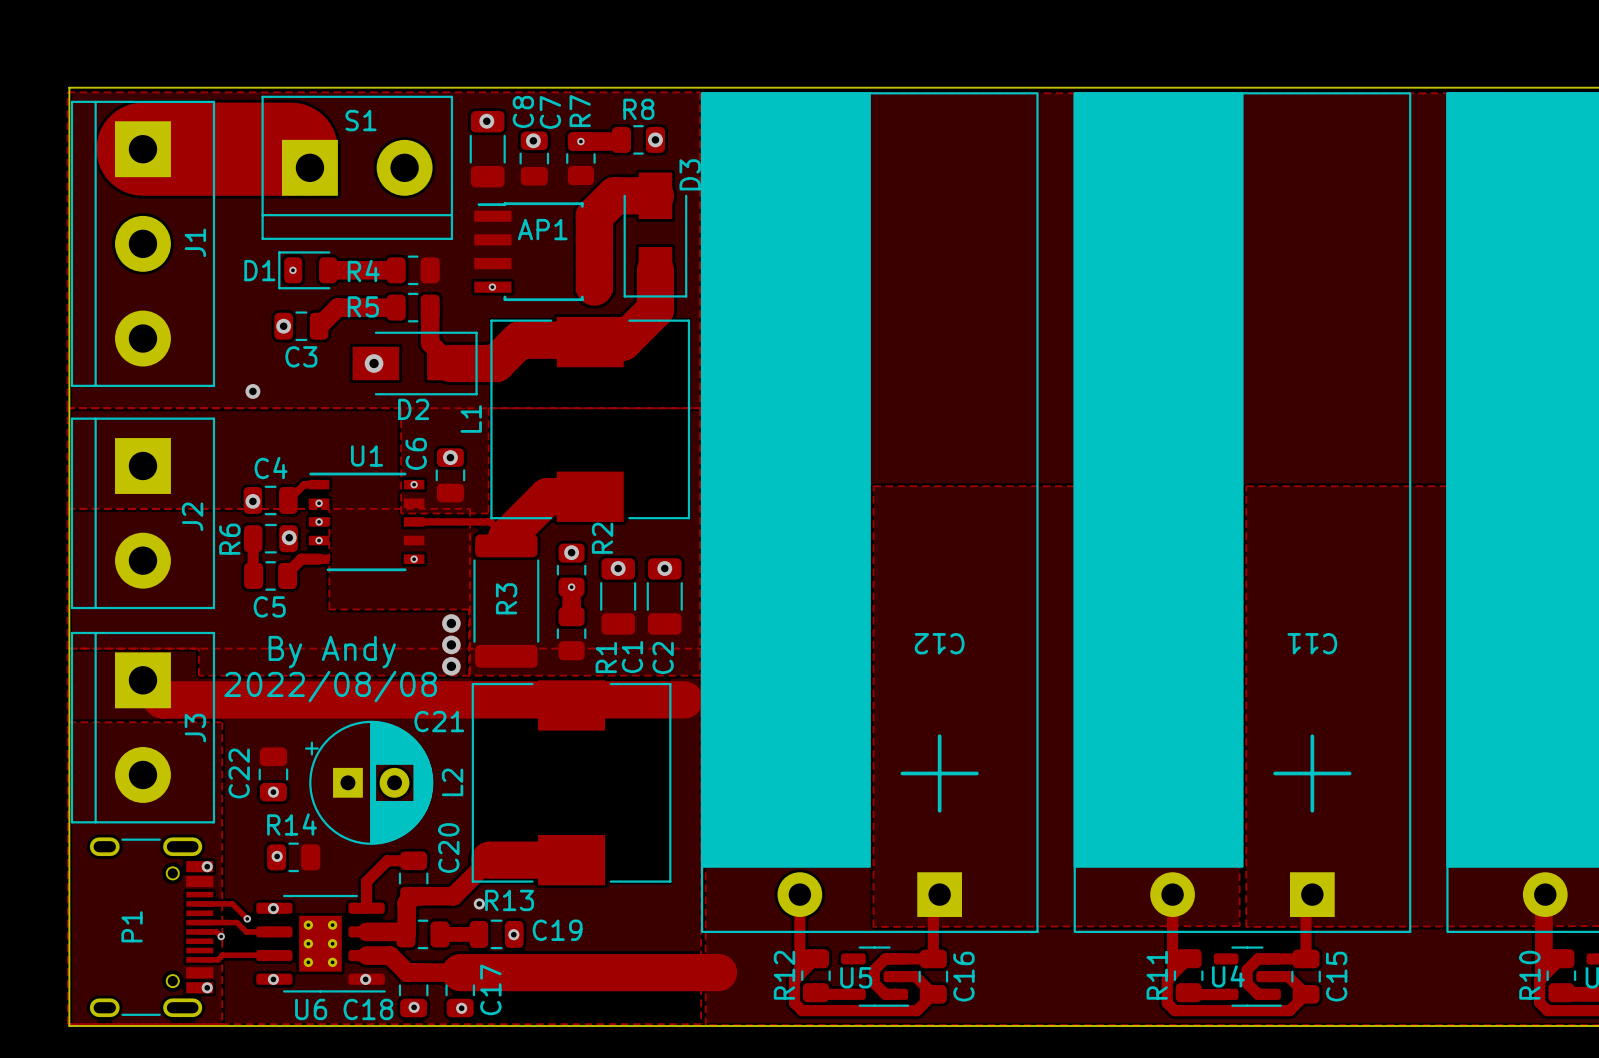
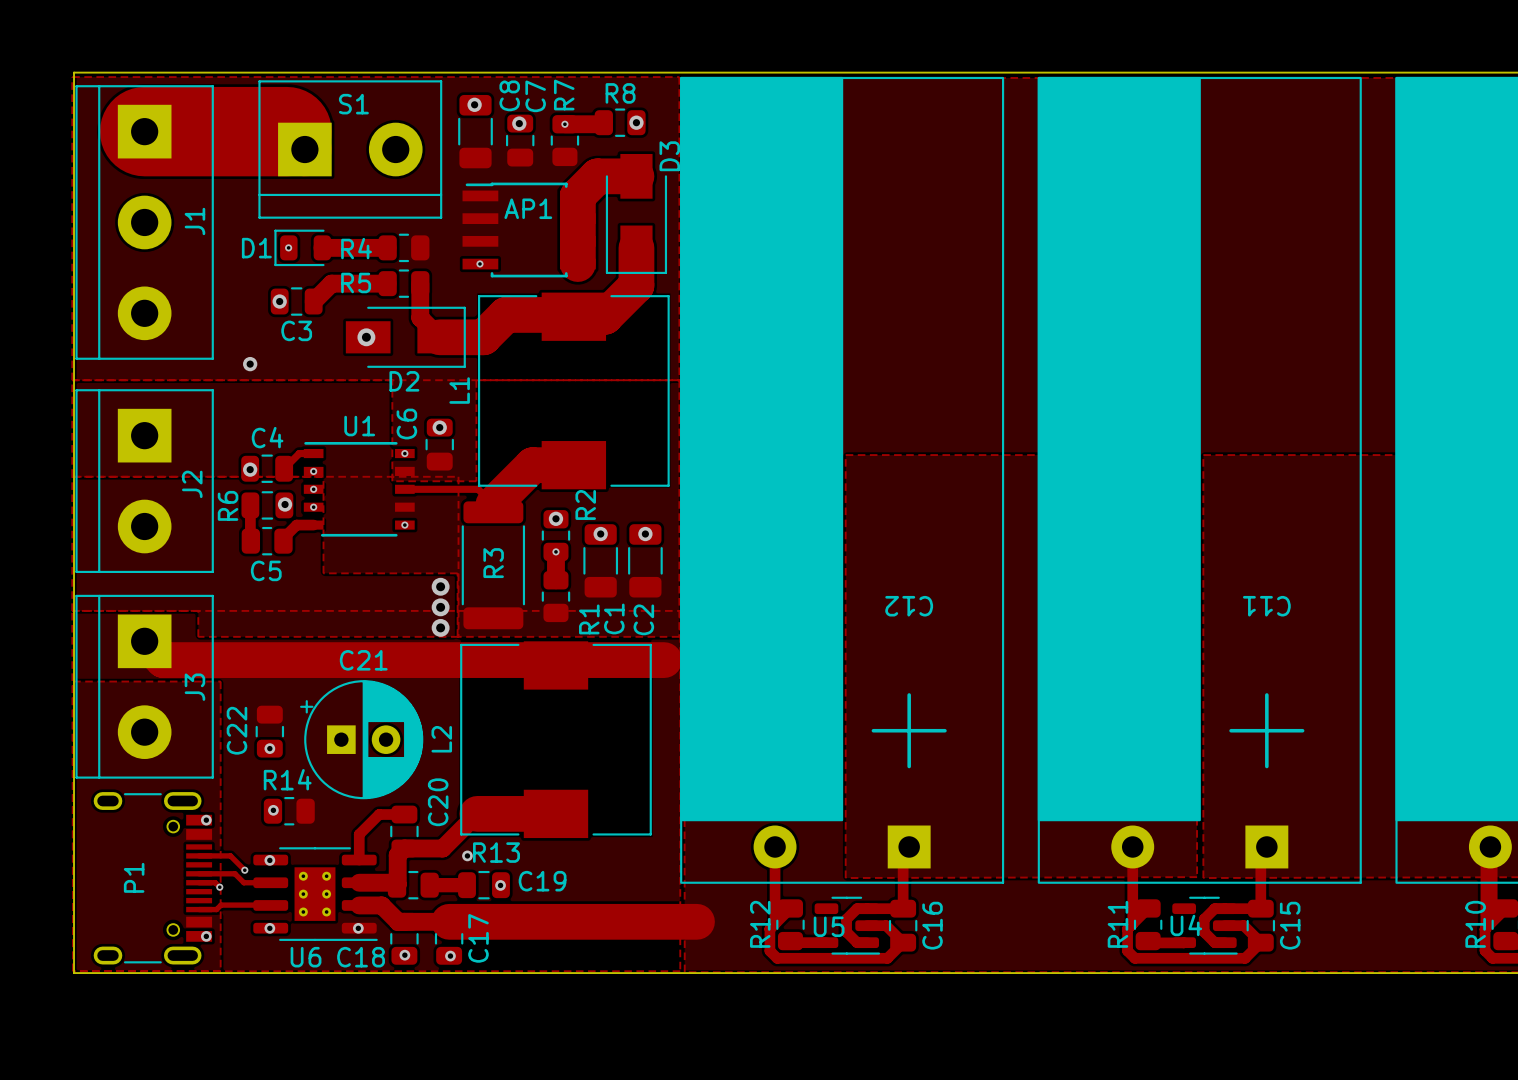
text: By Andy (332, 652) -> none
text: 2022/08/08 (330, 686) -> none
C21 name position: C21 (439, 721) -> C21 (363, 660)

